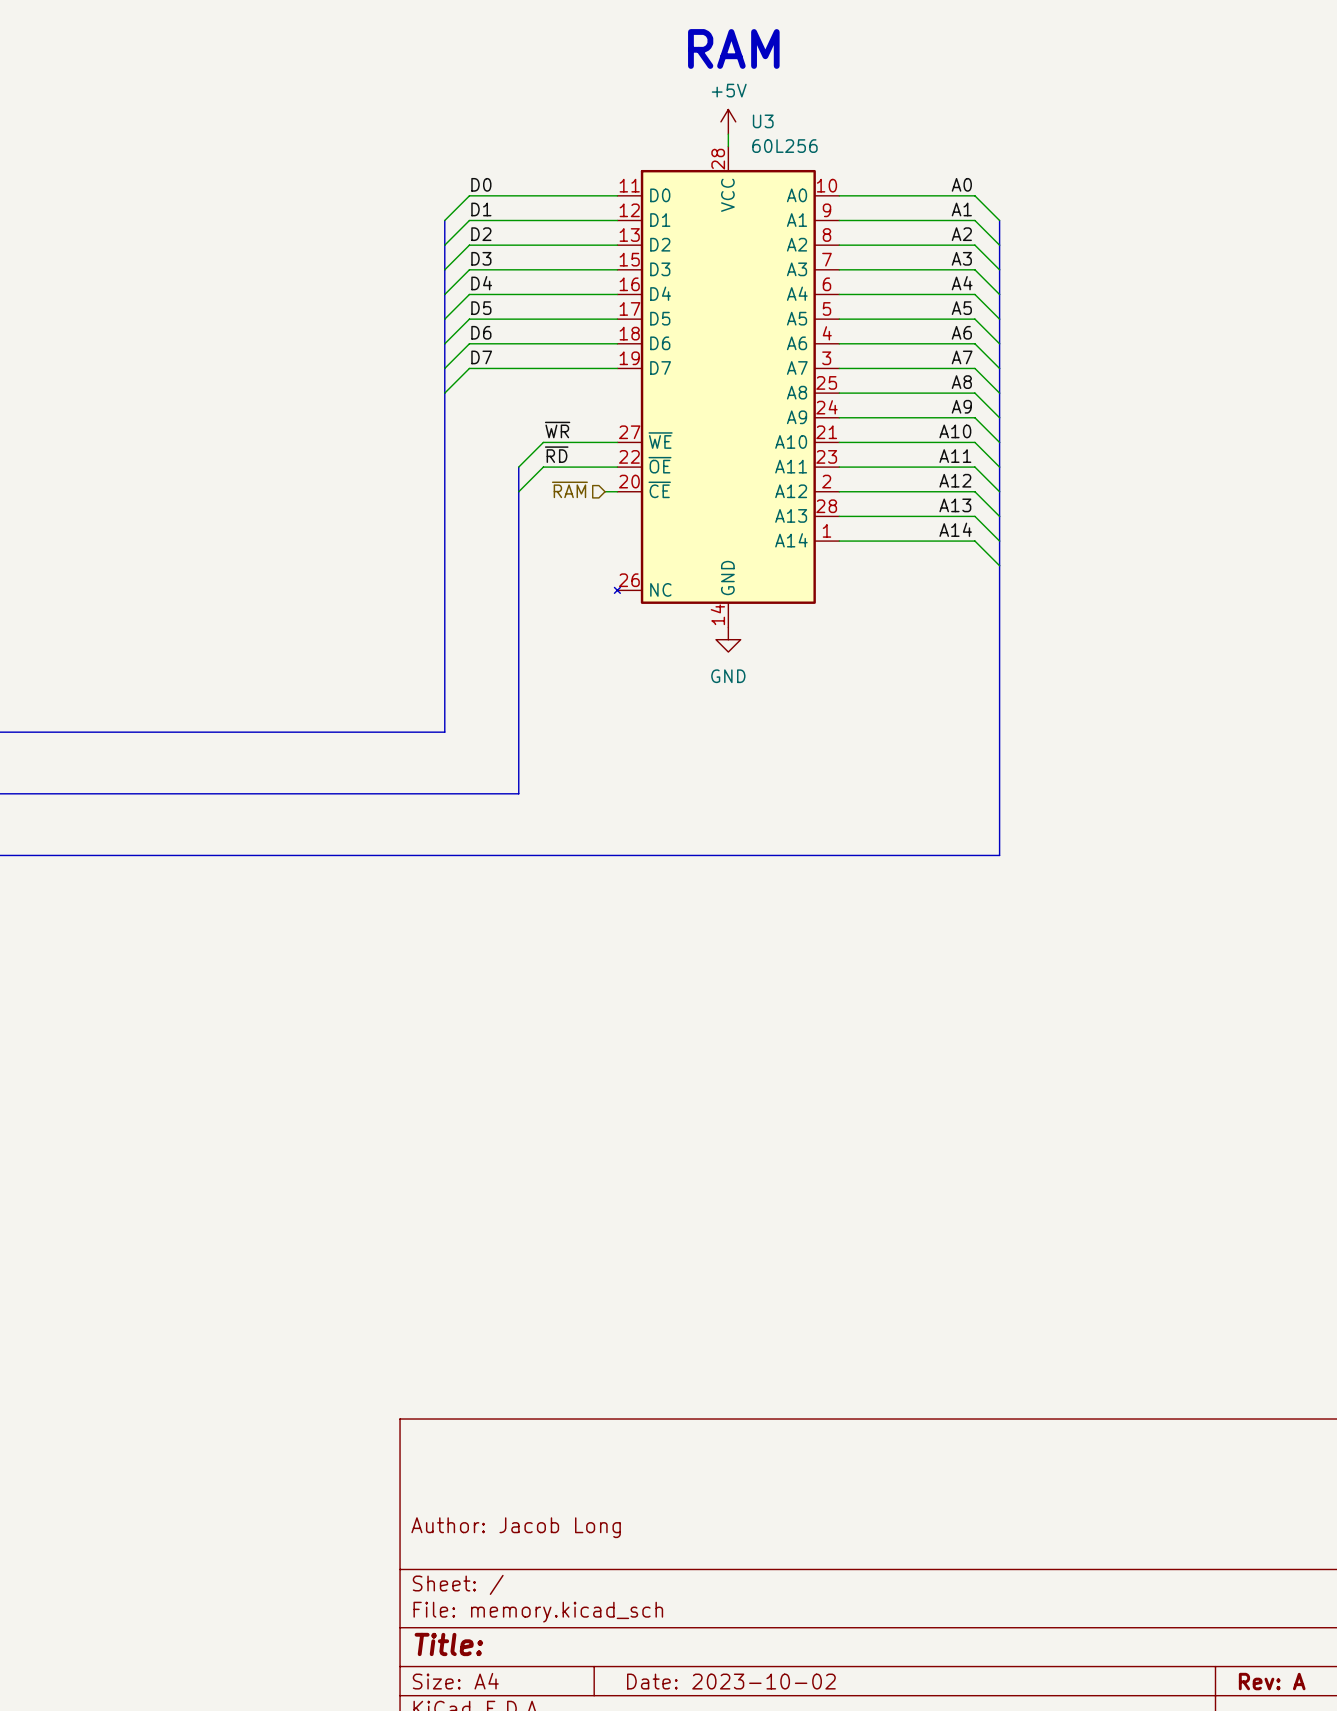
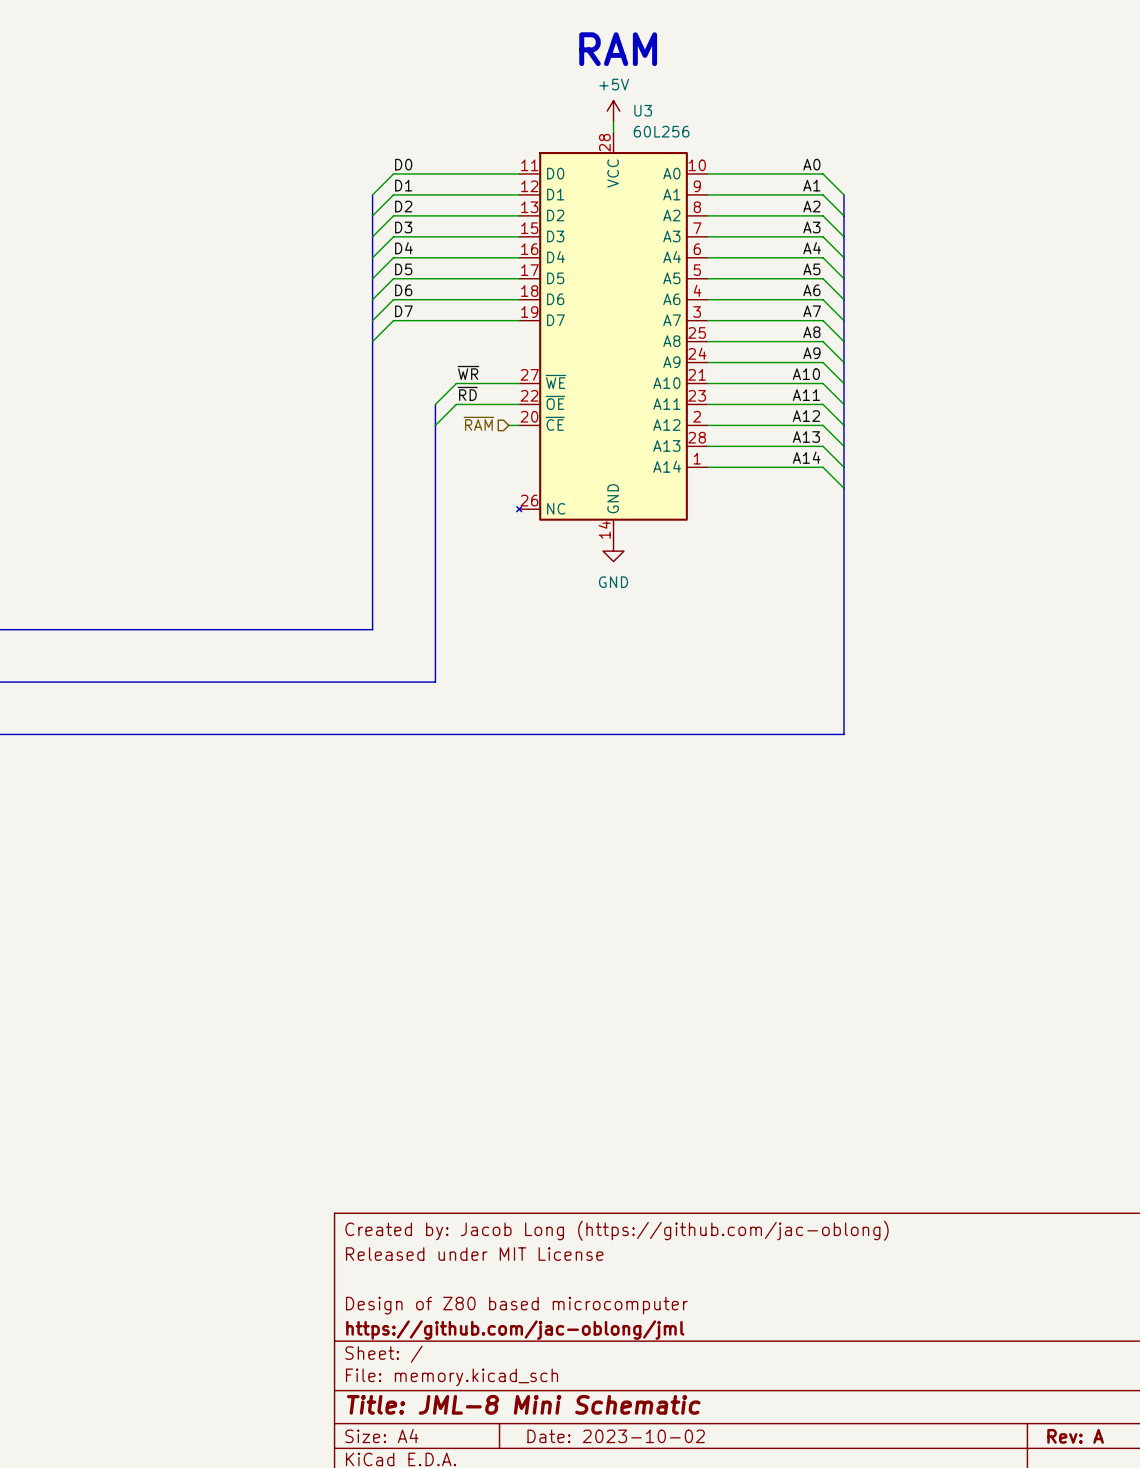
title block: none -> Created by: Jacob Long (https://github.com/jac-oblong) (617, 1230)
title block: none -> Released under MIT License (474, 1254)
title block: Author: Jacob Long (516, 1527) -> Design of Z80 based microcomputer (516, 1305)
title block: none -> https://github.com/jac-oblong/jml (515, 1330)
title block: Title: (448, 1644) -> Title: JML-8 Mini Schematic (523, 1404)

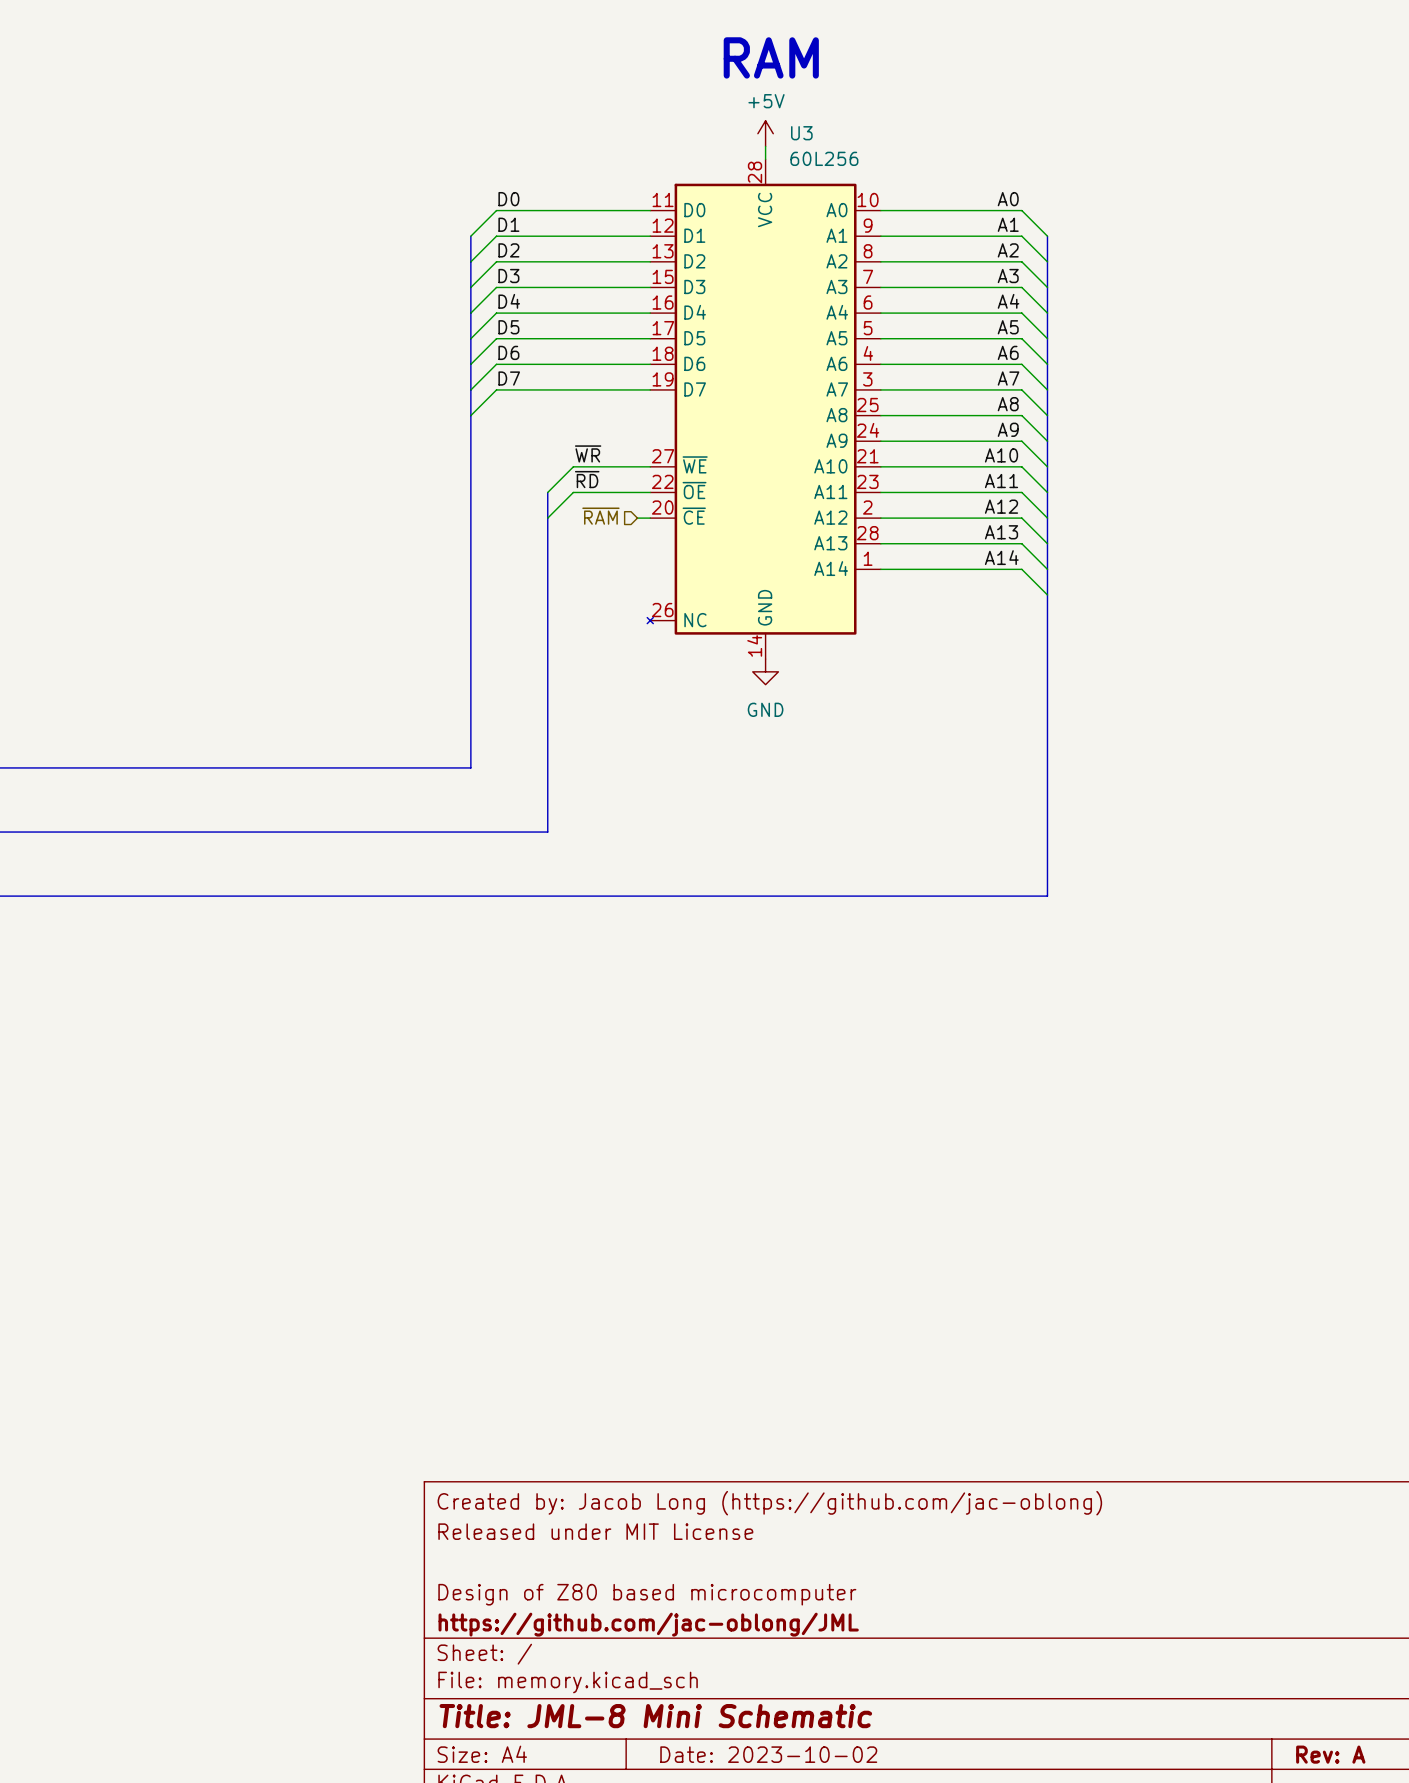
title block: https://github.com/jac-oblong/jml (515, 1330) -> https://github.com/jac-oblong/JML (648, 1624)

